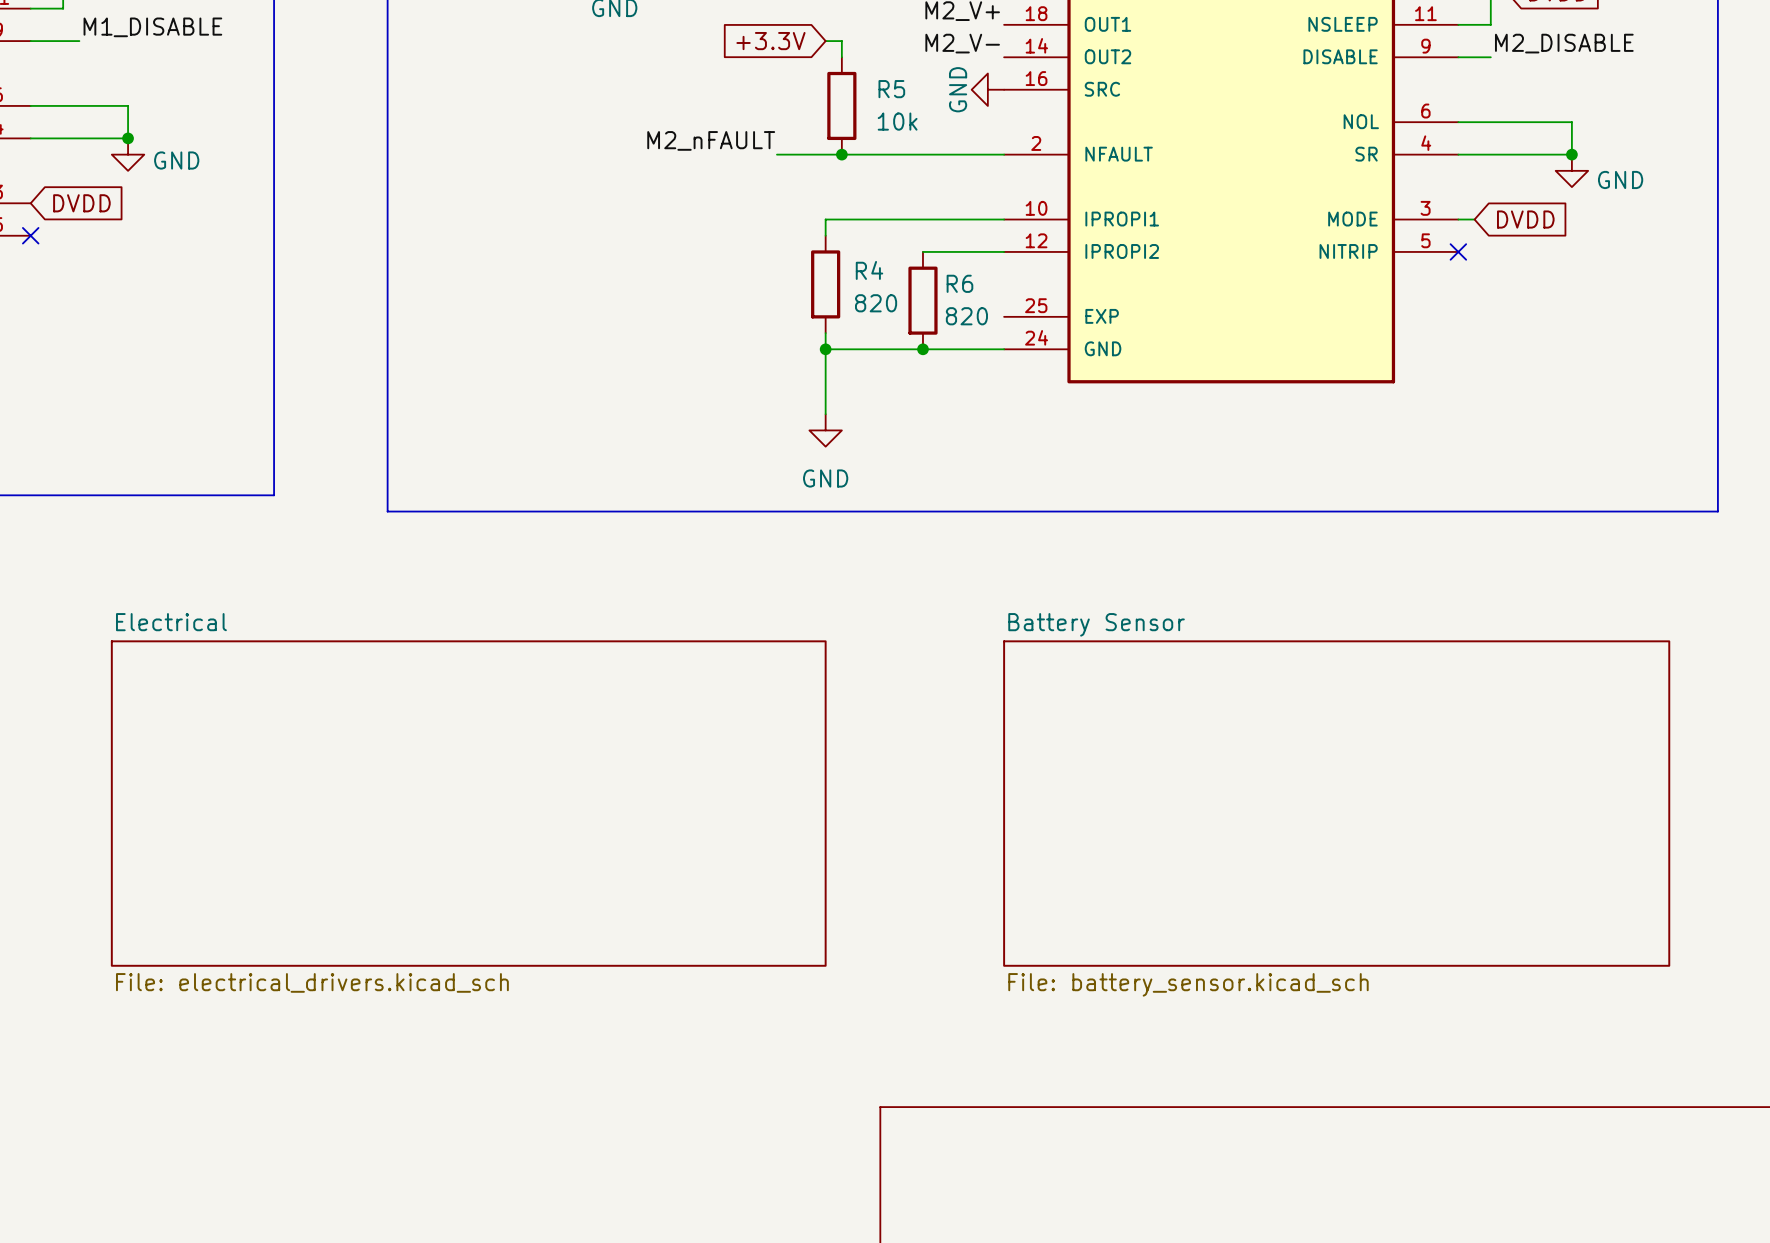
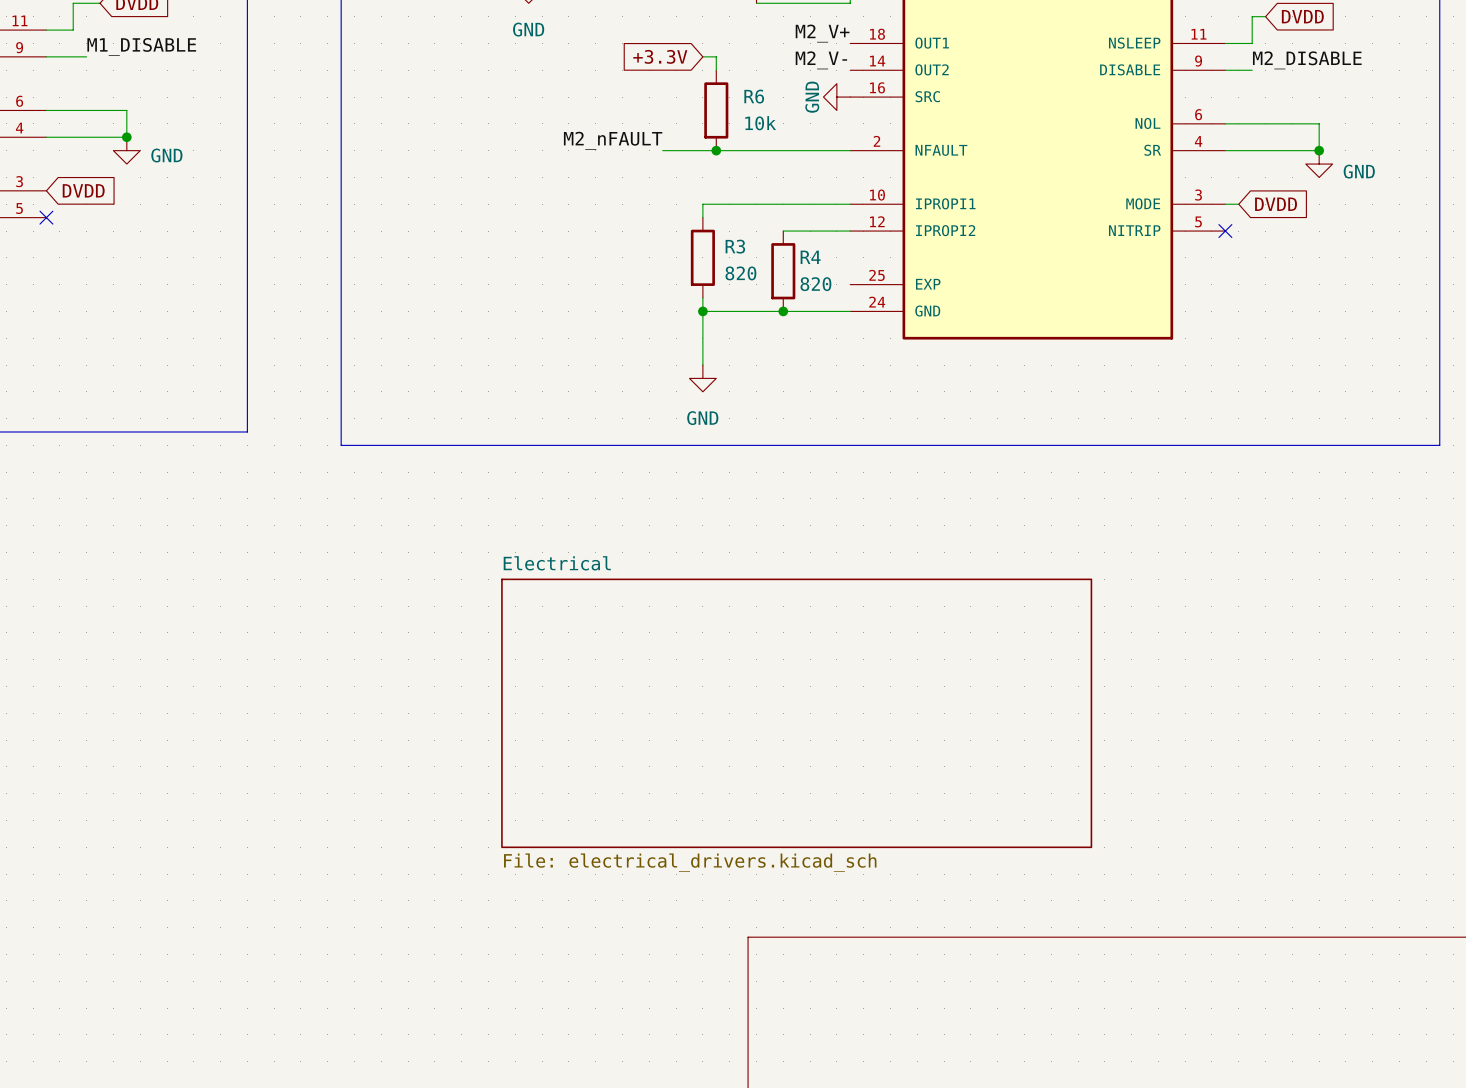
R5 name: R5 (891, 89) -> R6 (754, 96)
R4 name: R4 (869, 270) -> R3 (735, 246)
R6 name: R6 (959, 283) -> R4 (810, 257)
sheet Electrical: File: electrical_drivers.kicad_sch (468, 803) -> none
sheet Battery Sensor: File: battery_sensor.kicad_sch (1336, 803) -> none
sheet Electrical: none -> File: electrical_drivers.kicad_sch (796, 713)

